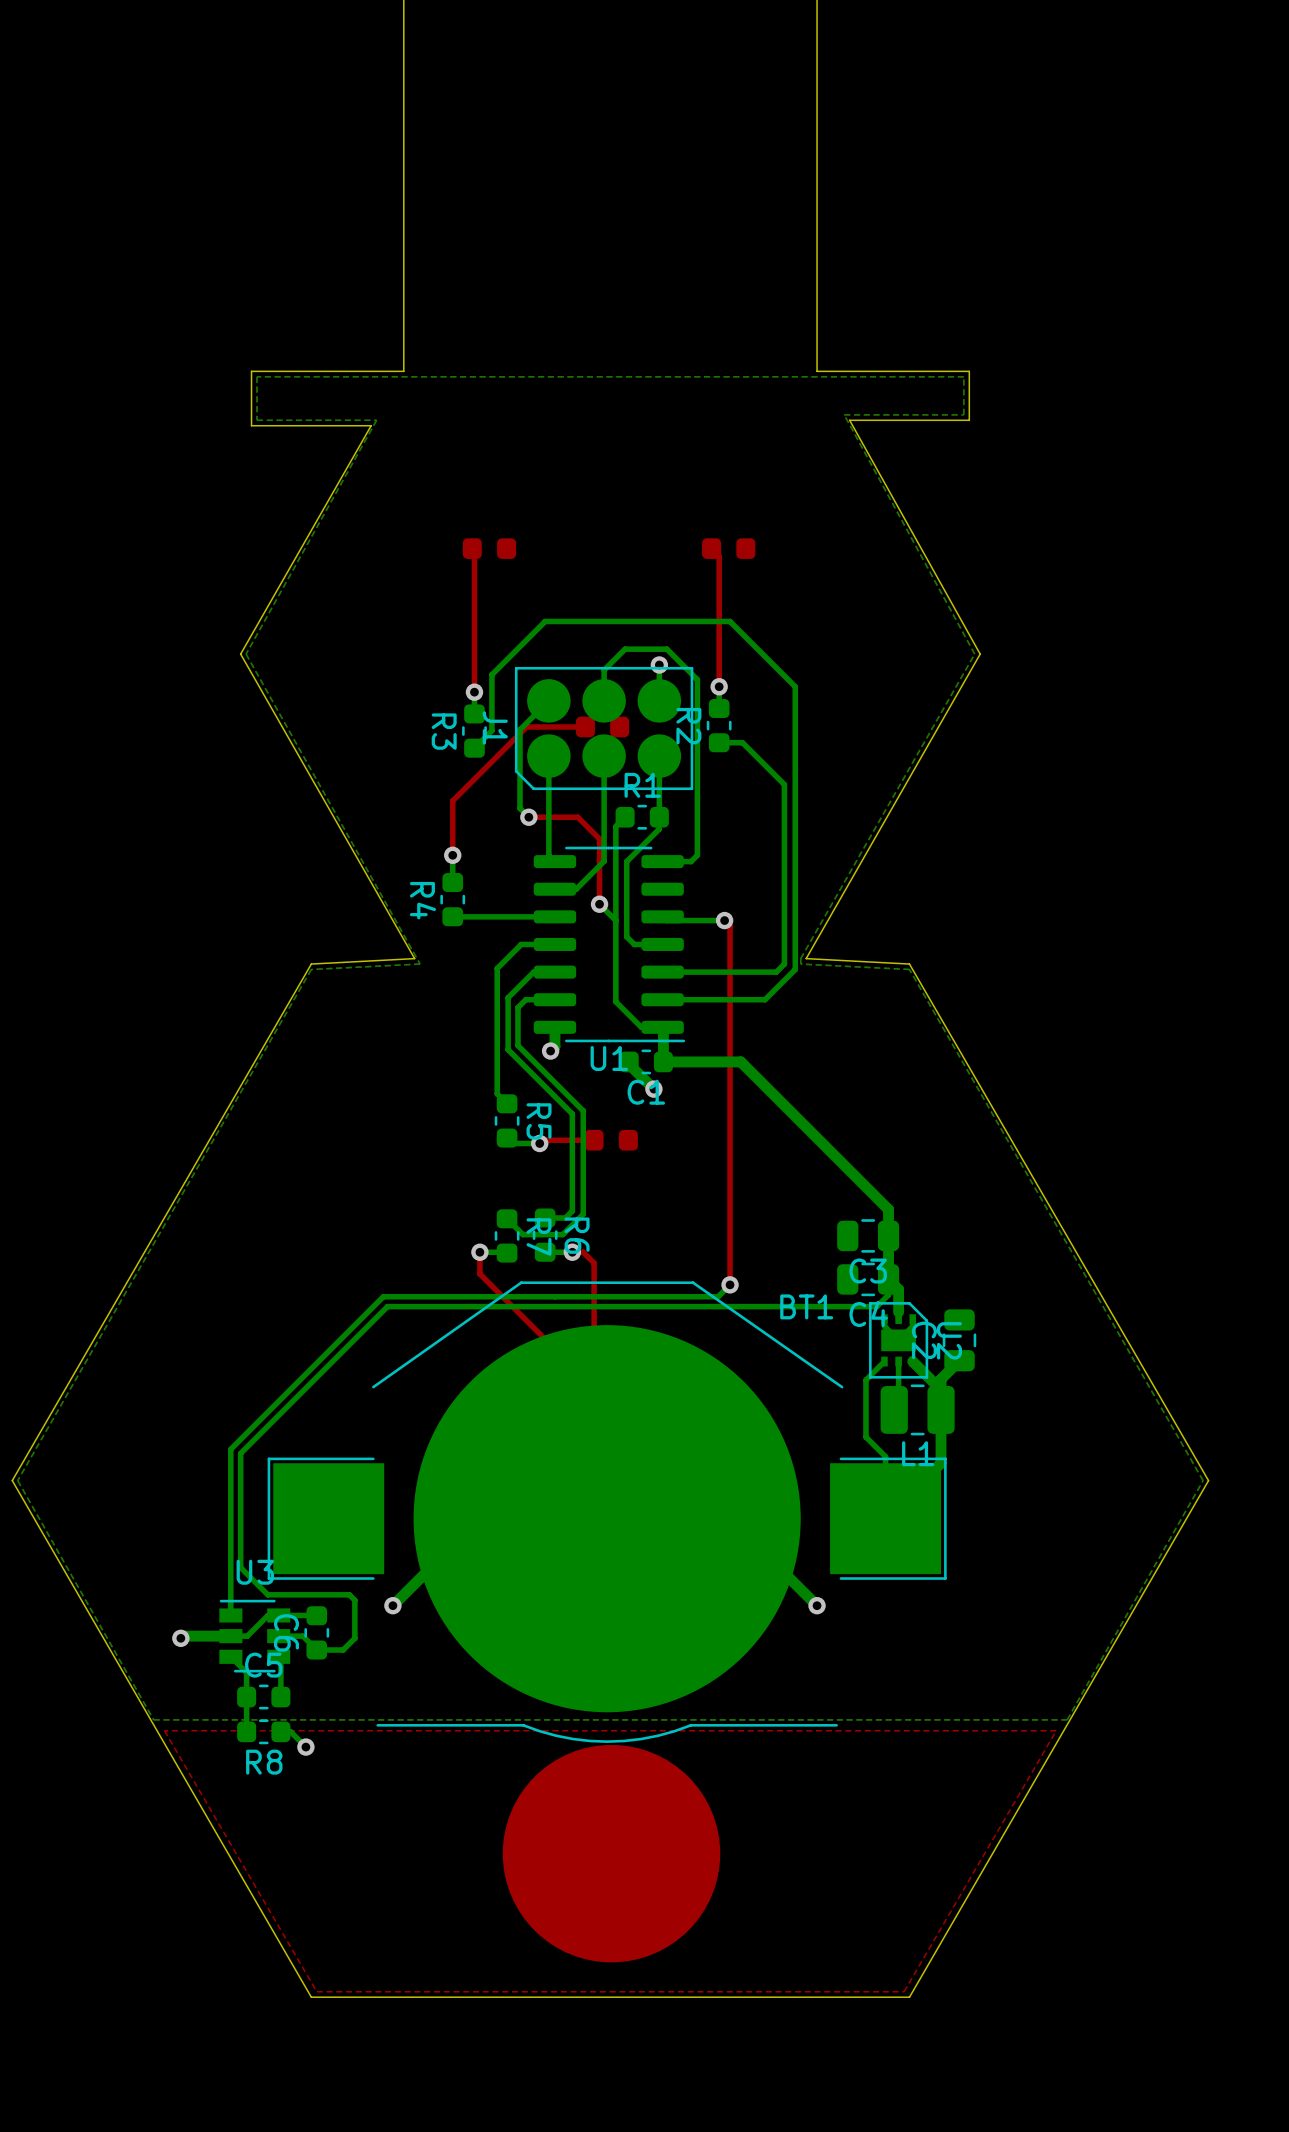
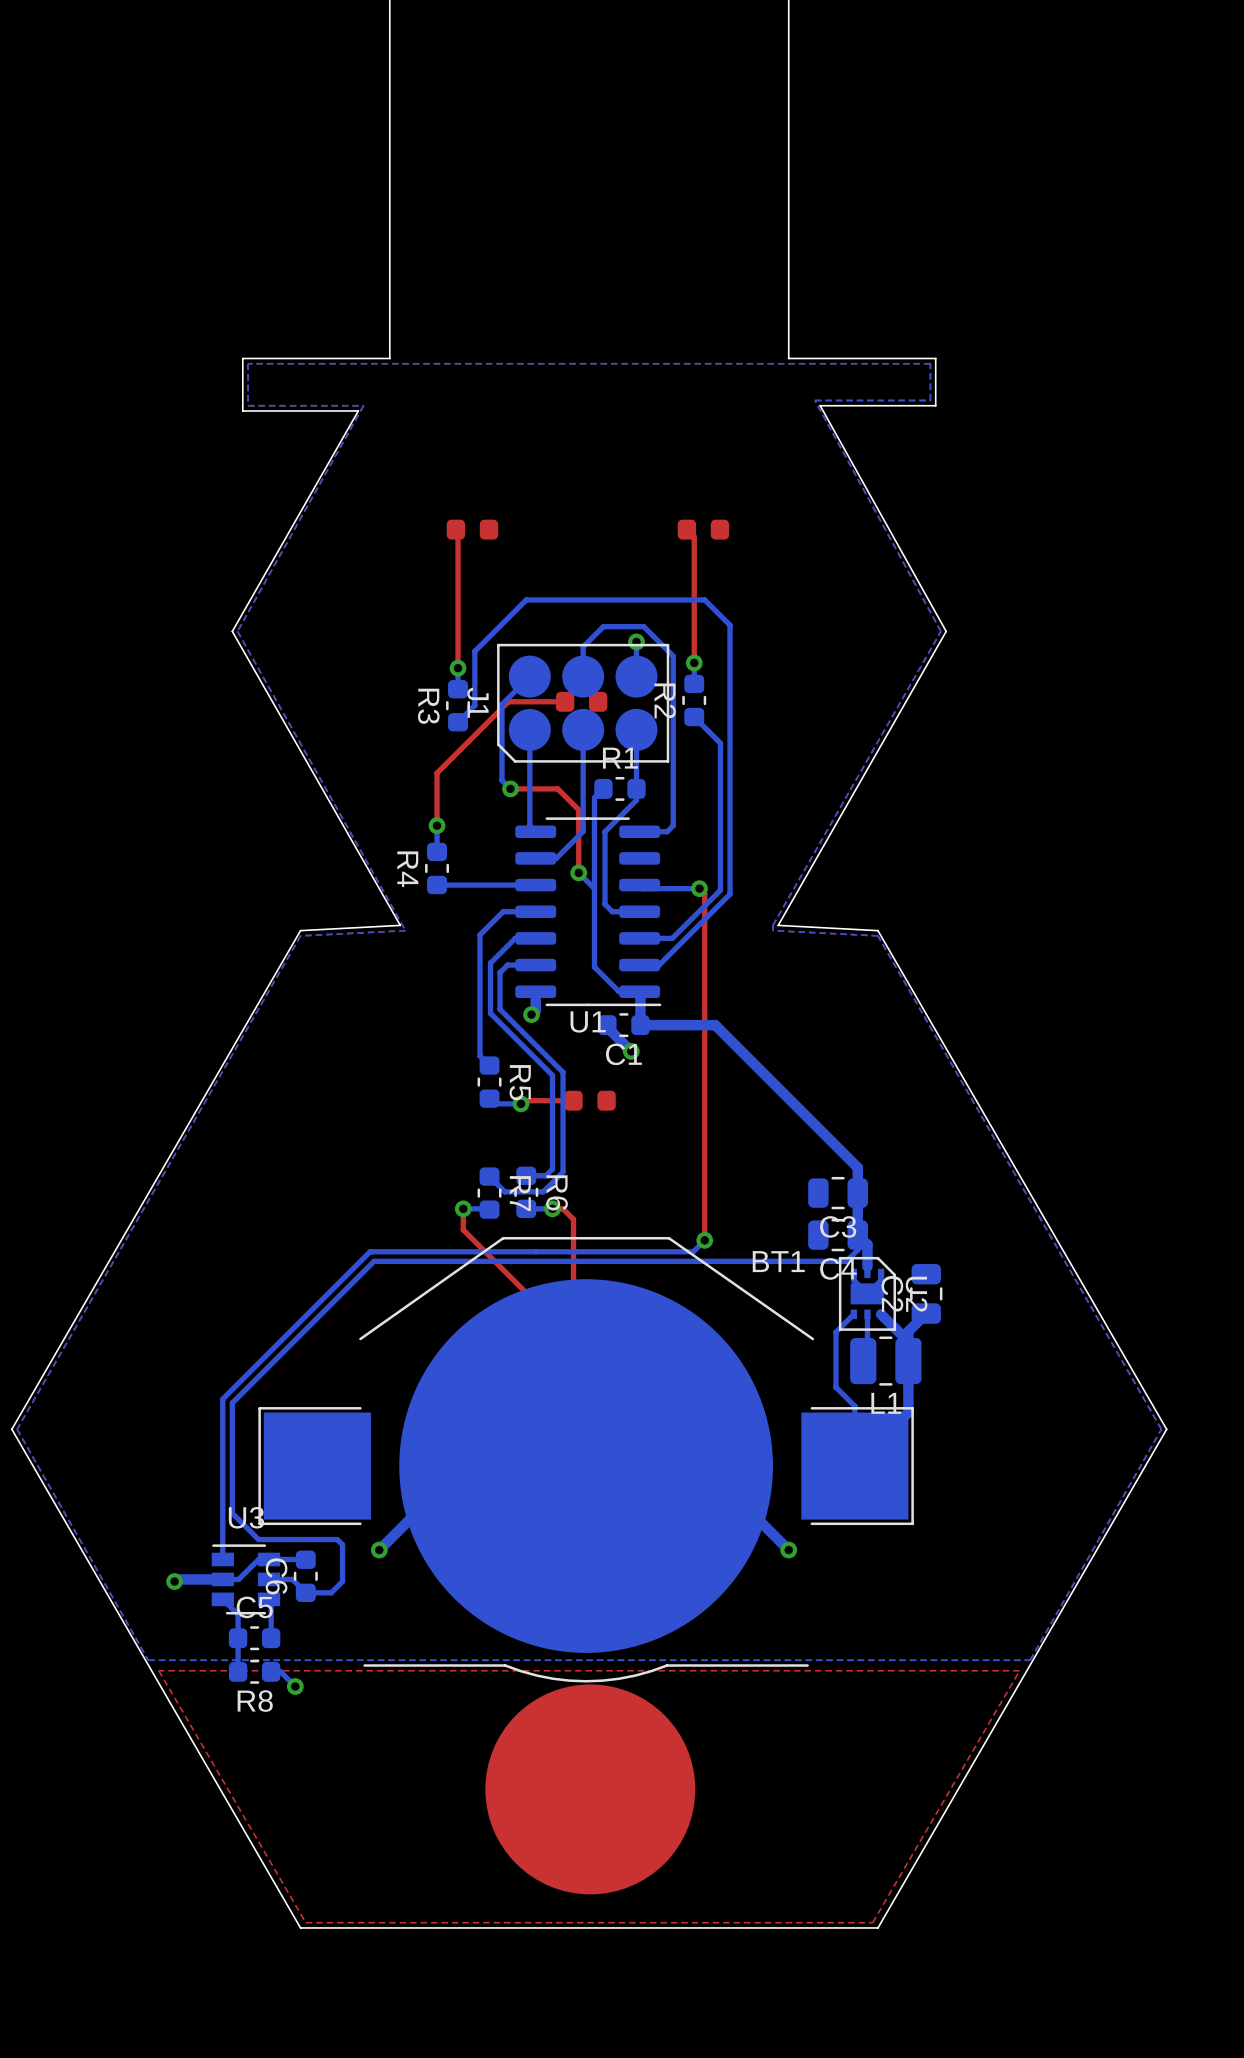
bottom track: (756, 647) (795, 686) (795, 969) (765, 999) (682, 999) -> (730, 625) (730, 894) (659, 965)
bottom track: (719, 742) (742, 742) (784, 784) (784, 964) (776, 972) (696, 972) -> (694, 717) (720, 743) (720, 890) (672, 938)

